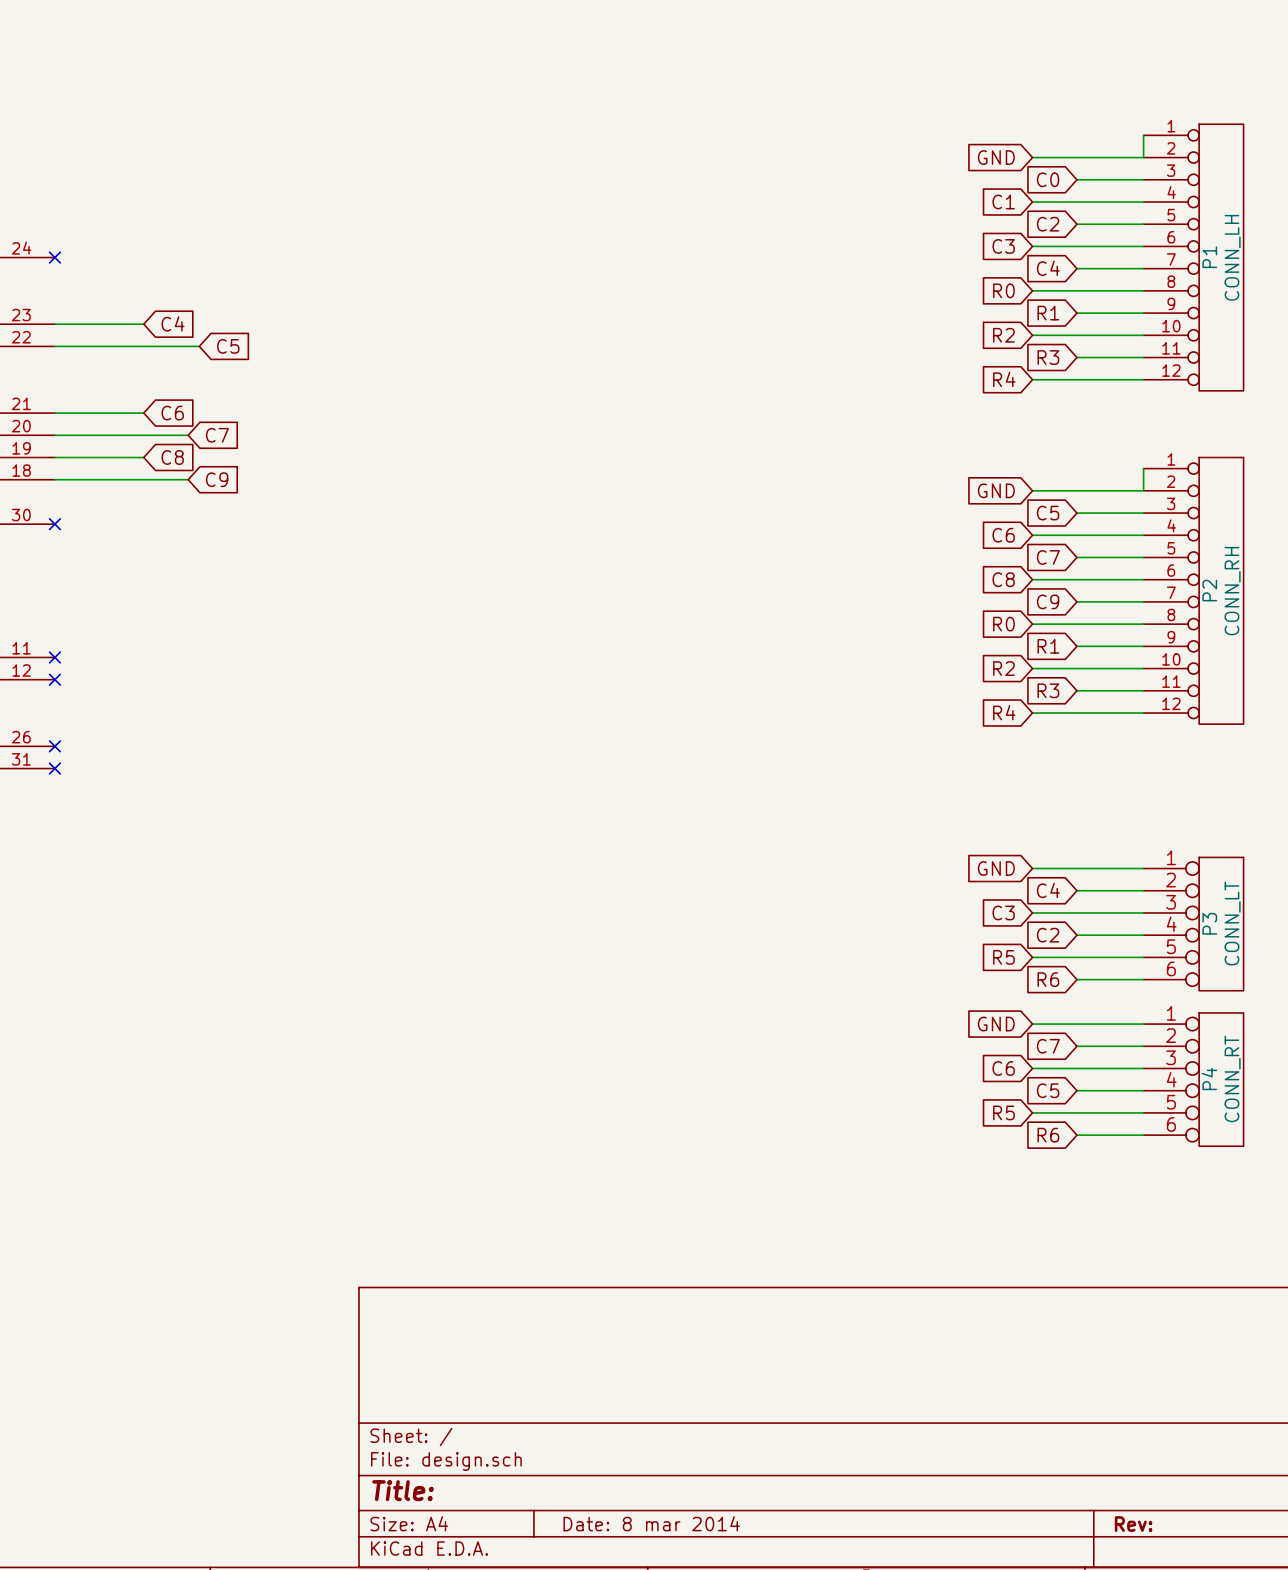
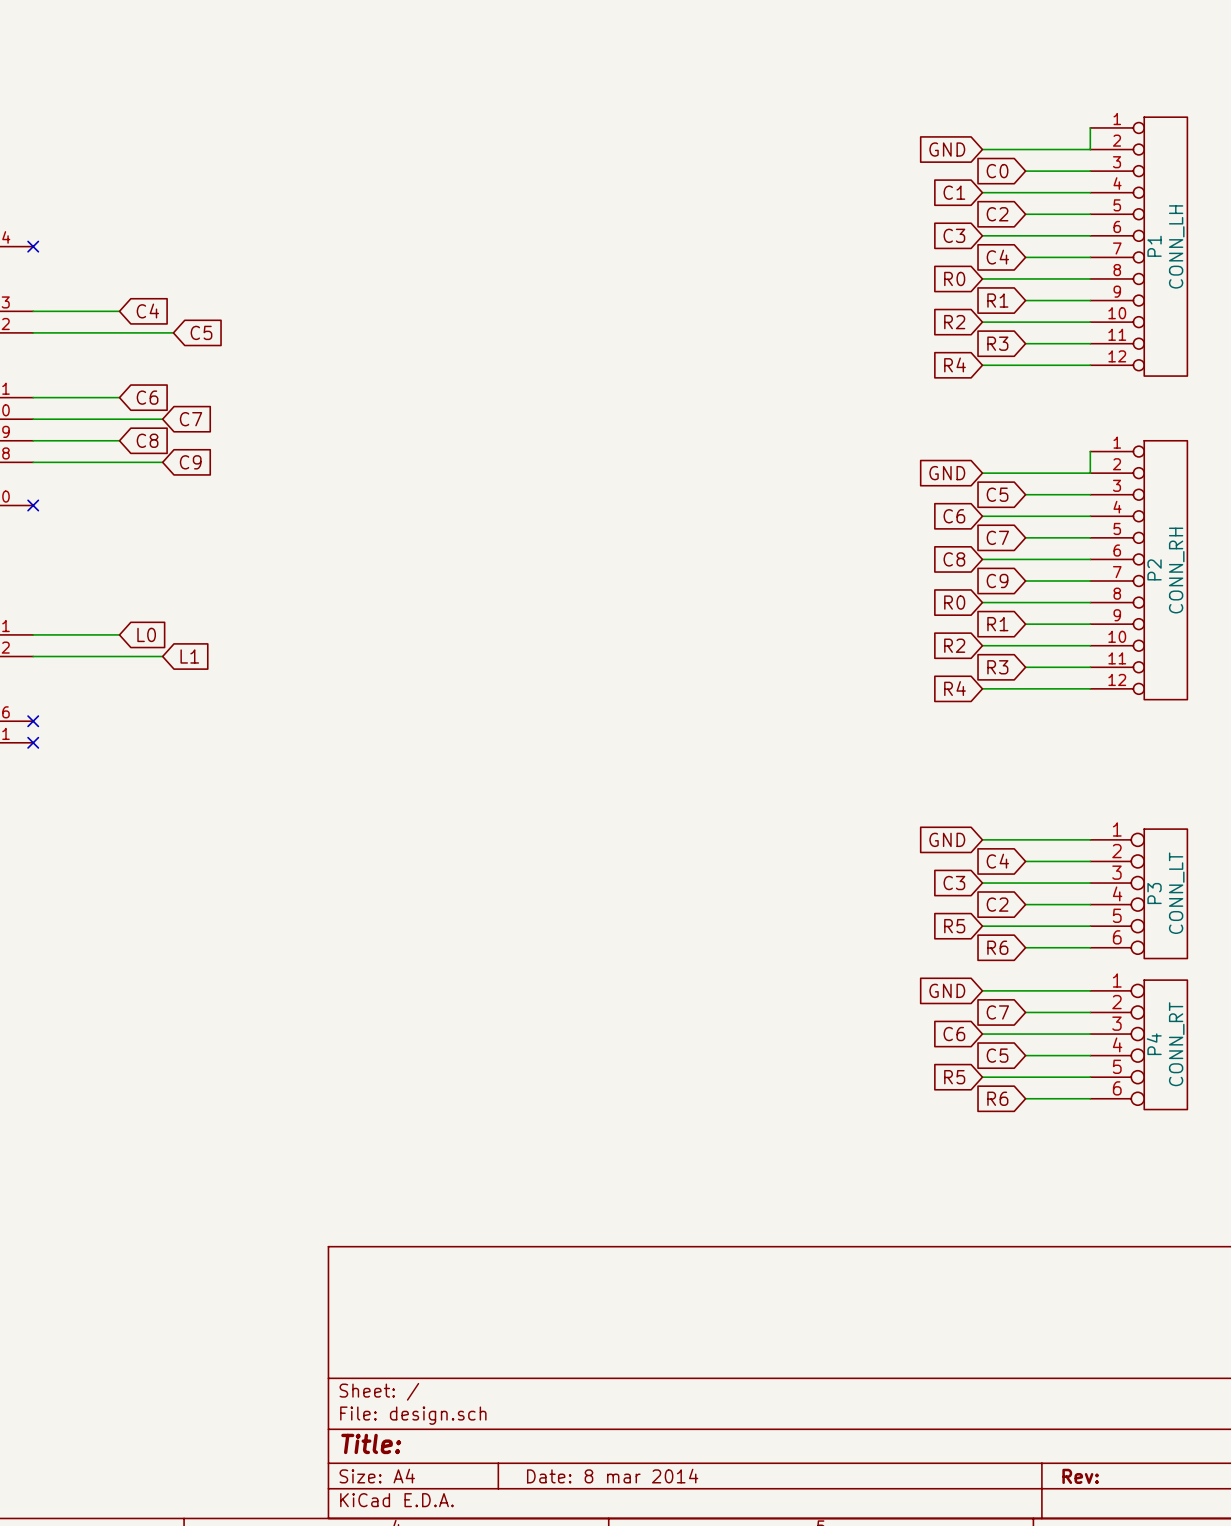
wire: none -> (33, 634) (119, 634)
no-connect mark: (54, 657) -> none
global label: none -> L0 (146, 634)
wire: none -> (33, 656) (162, 656)
no-connect mark: (54, 679) -> none
global label: none -> L1 (189, 656)

